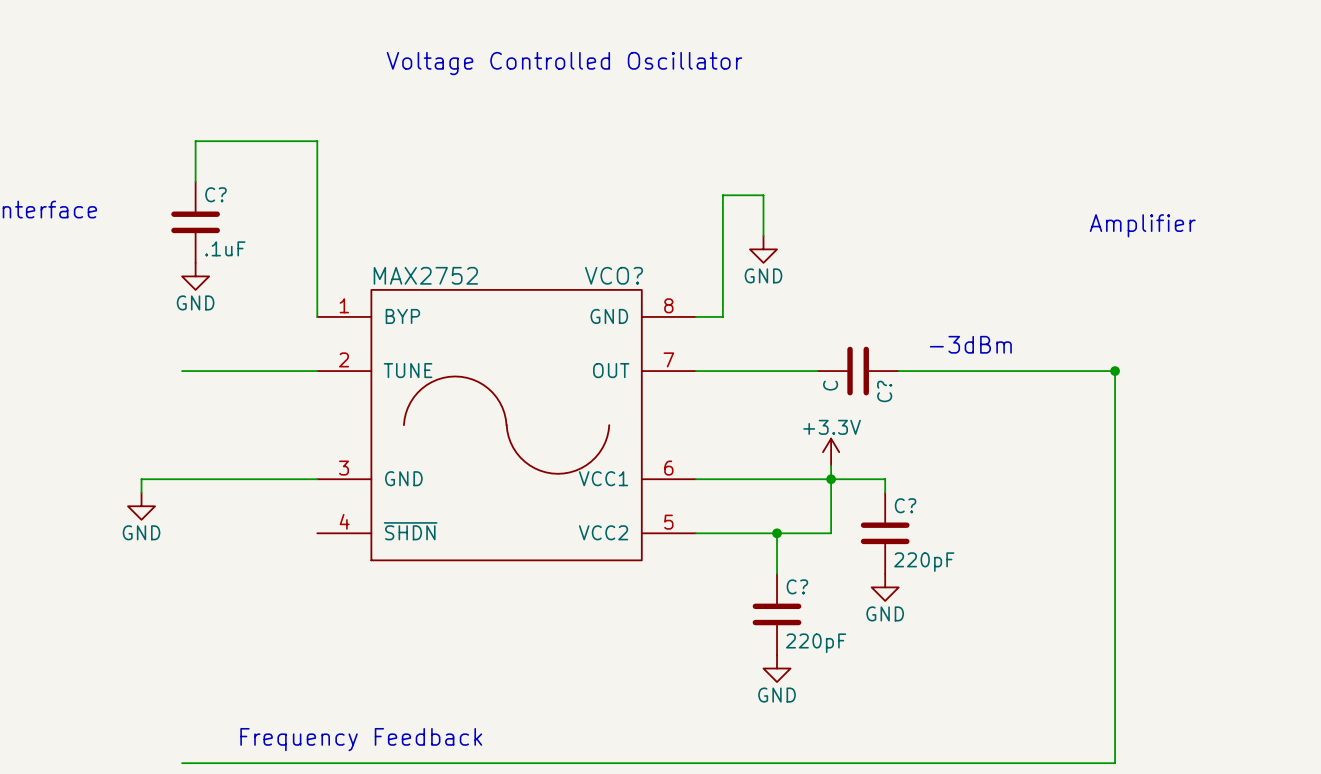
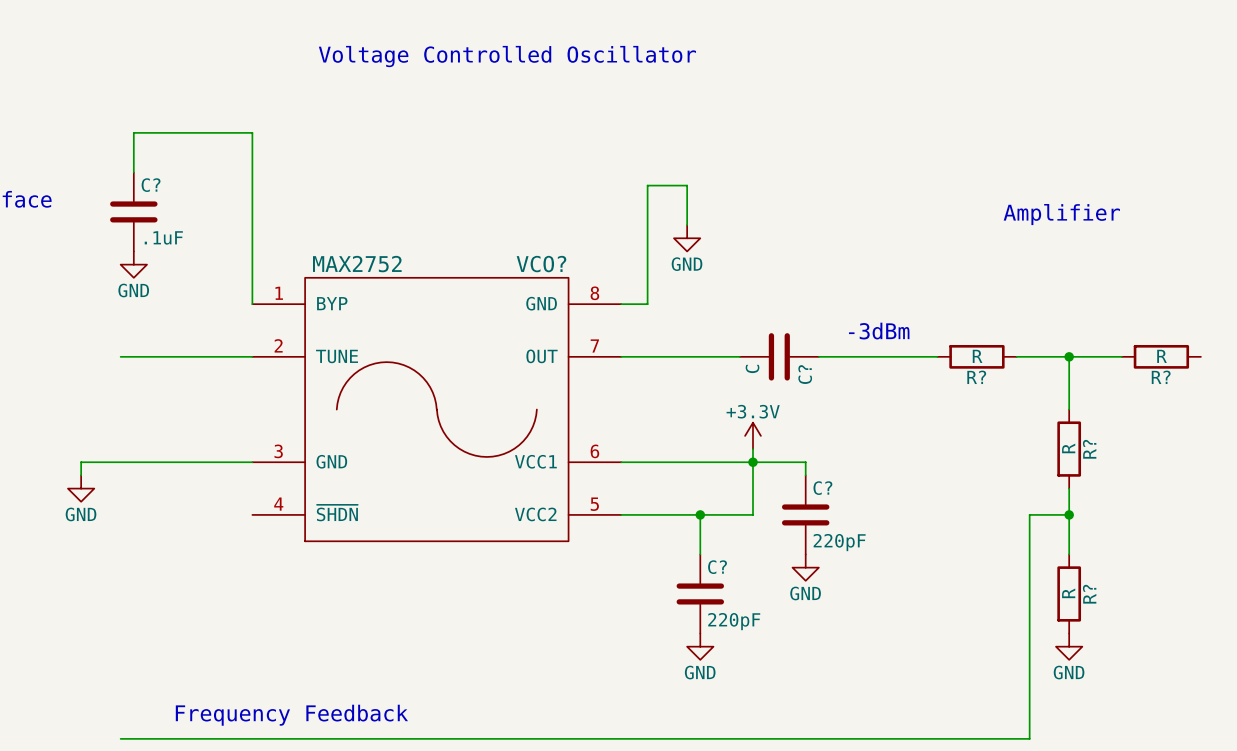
wire: (1020, 371) (1101, 371) -> none
R?: none -> R (976, 356)
wire: (1115, 371) (1115, 533) -> (1069, 514) (1029, 514)
wire: none -> (1029, 356) (1121, 356)
junction position: (1115, 371) -> (1069, 356)
wire: none -> (1069, 356) (1069, 409)
R?: none -> R (1161, 356)
R?: none -> R (1069, 449)
wire: none -> (1069, 488) (1069, 554)
junction: none -> (1069, 514)
R?: none -> R (1069, 593)
power symbol: none -> GND (1069, 646)

